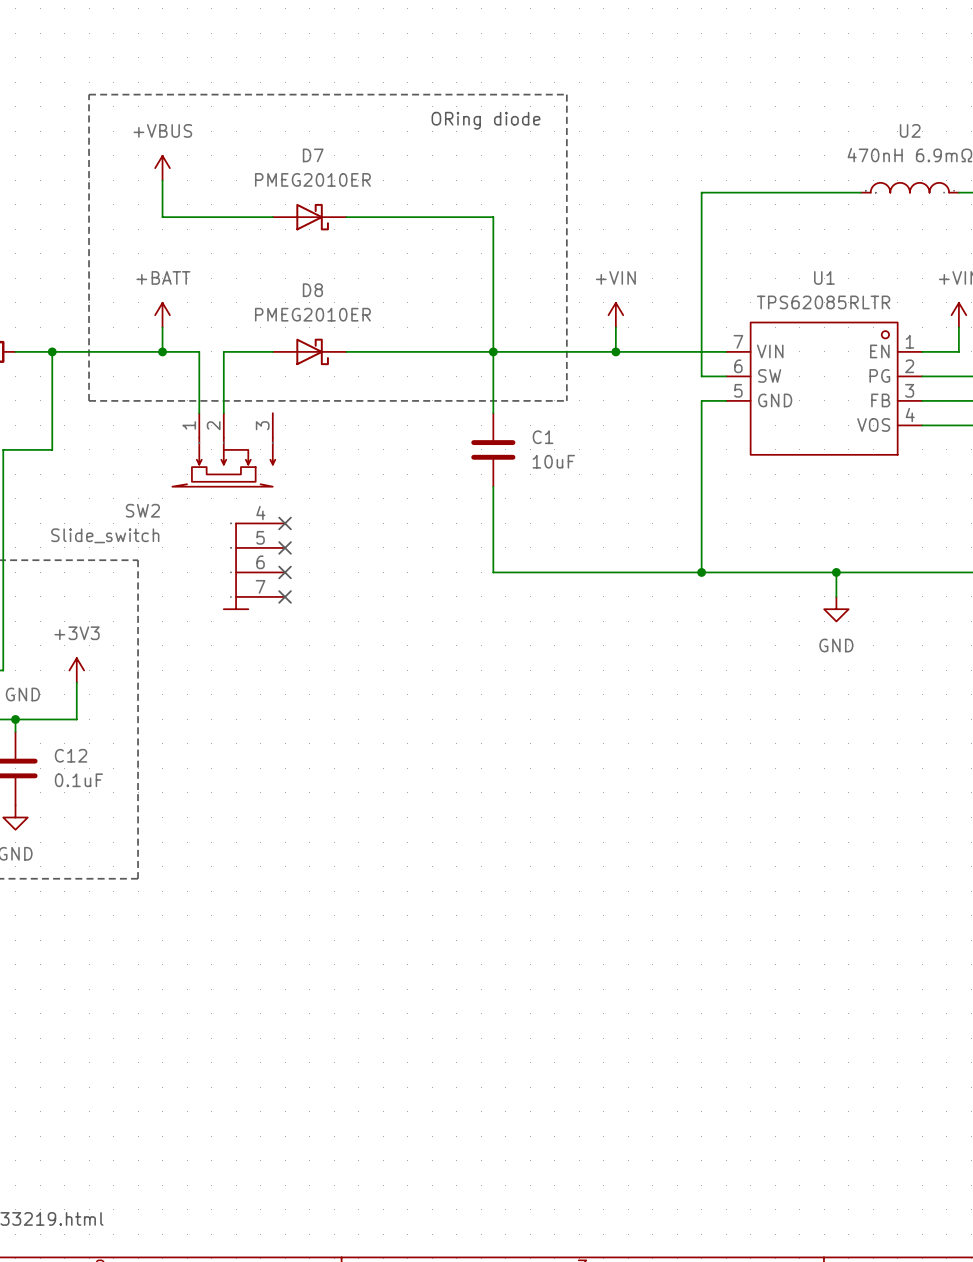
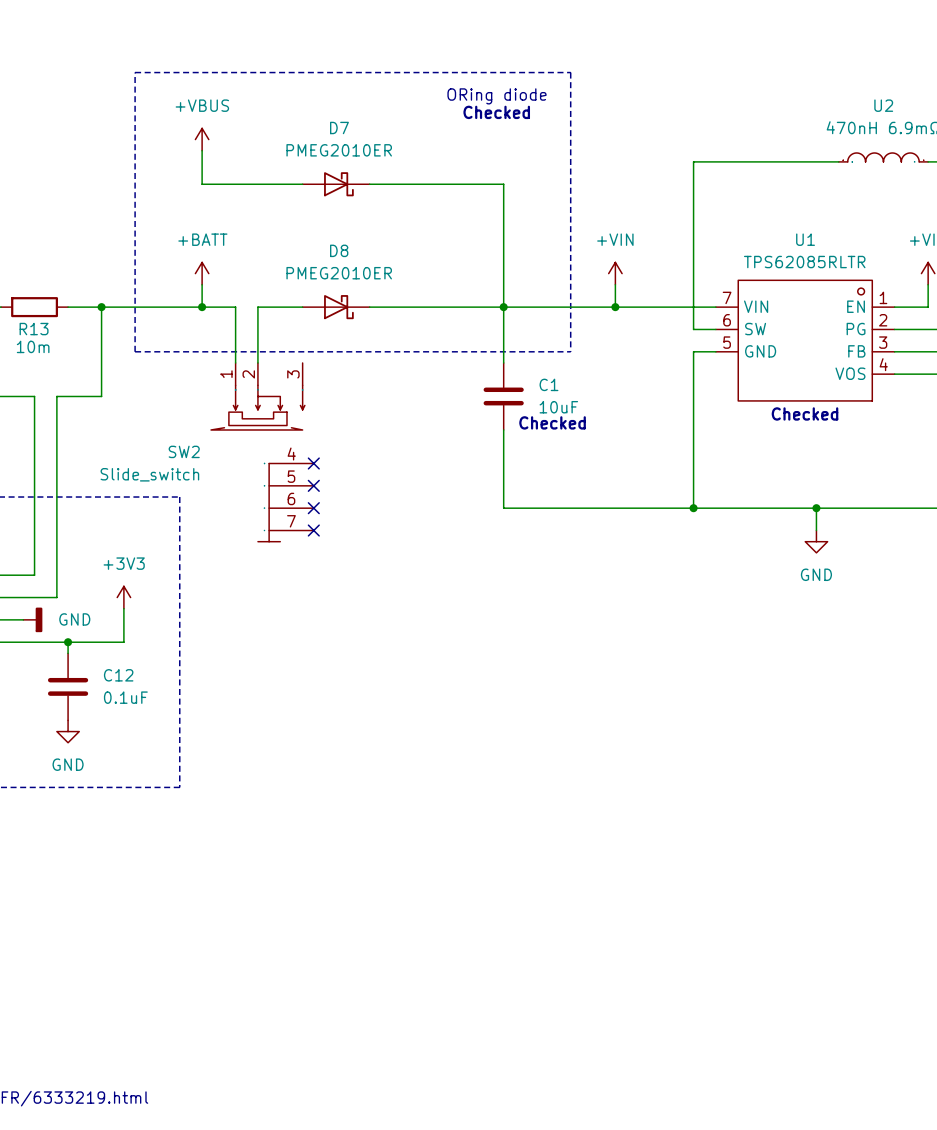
text: none -> Checked (496, 112)
text: none -> Checked (805, 413)
text: none -> Checked (552, 422)

